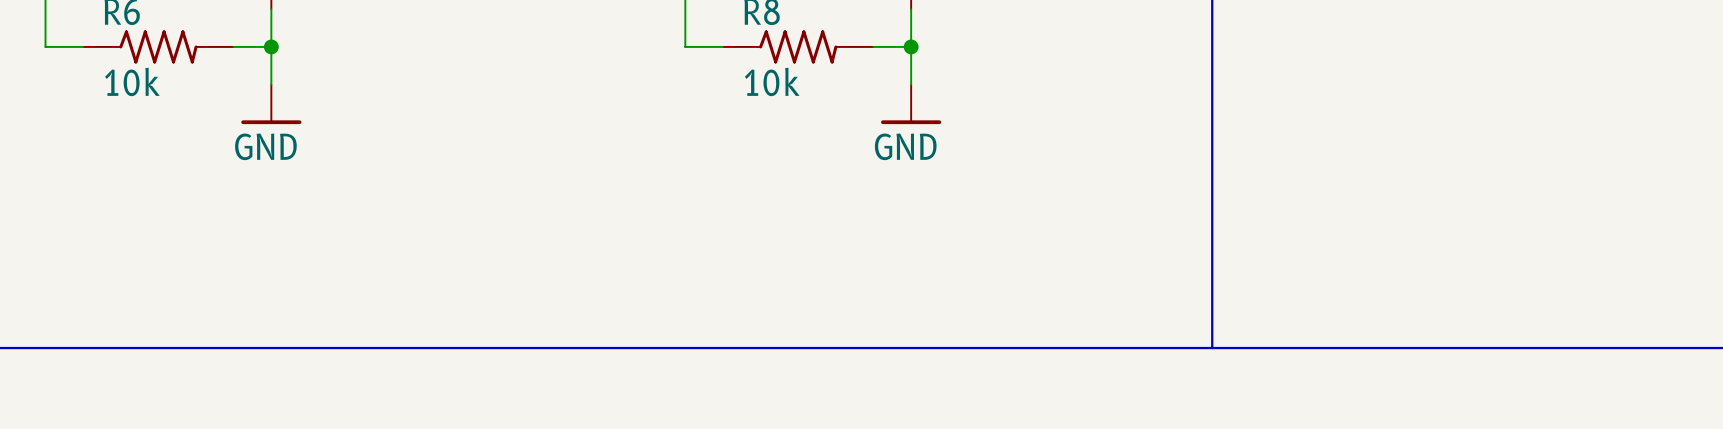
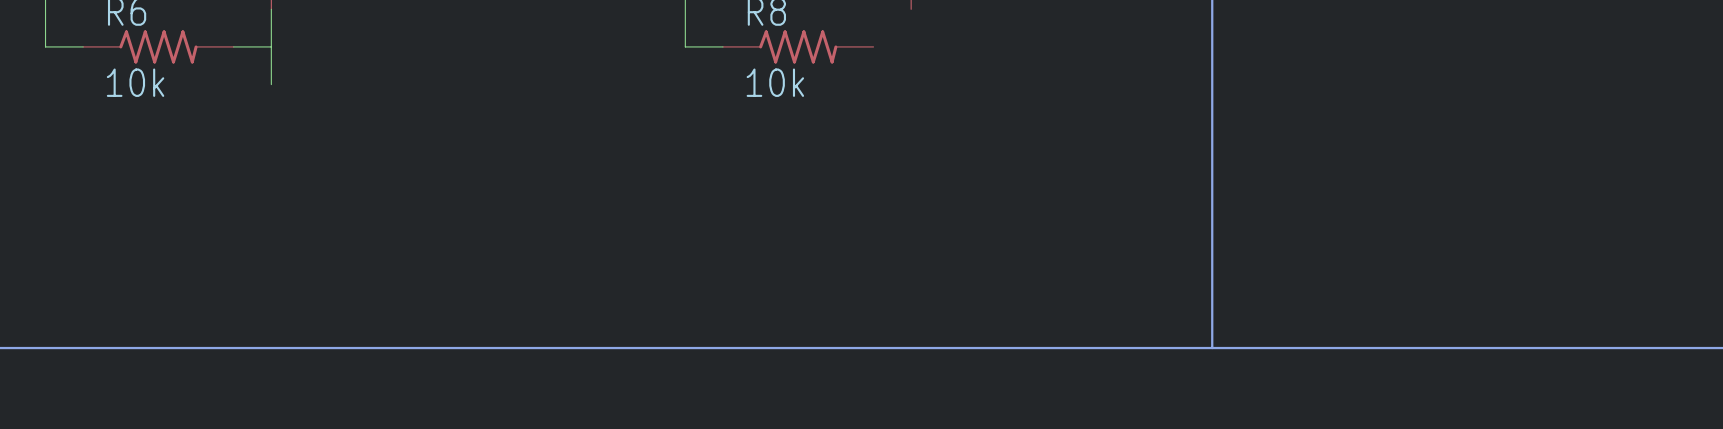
wire: (911, 9) (911, 84) -> none
junction: (271, 46) -> none
wire: (873, 46) (911, 46) -> none
junction: (911, 46) -> none
power symbol: GND (271, 104) -> none
power symbol: GND (911, 104) -> none

